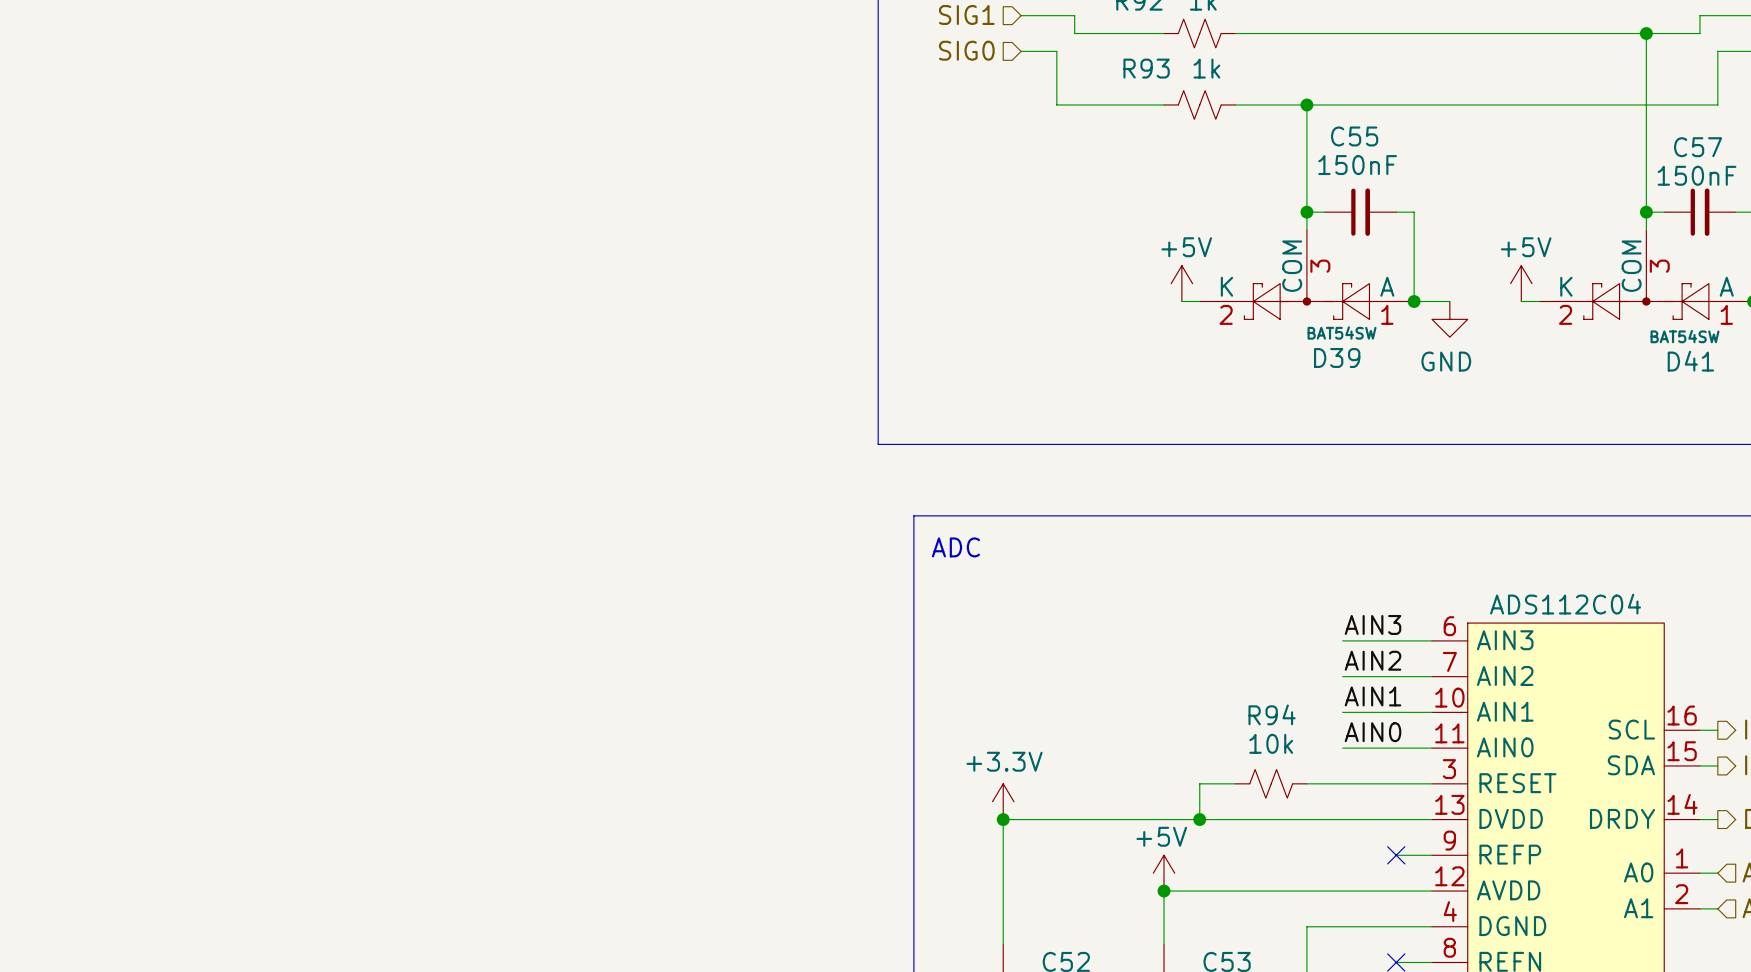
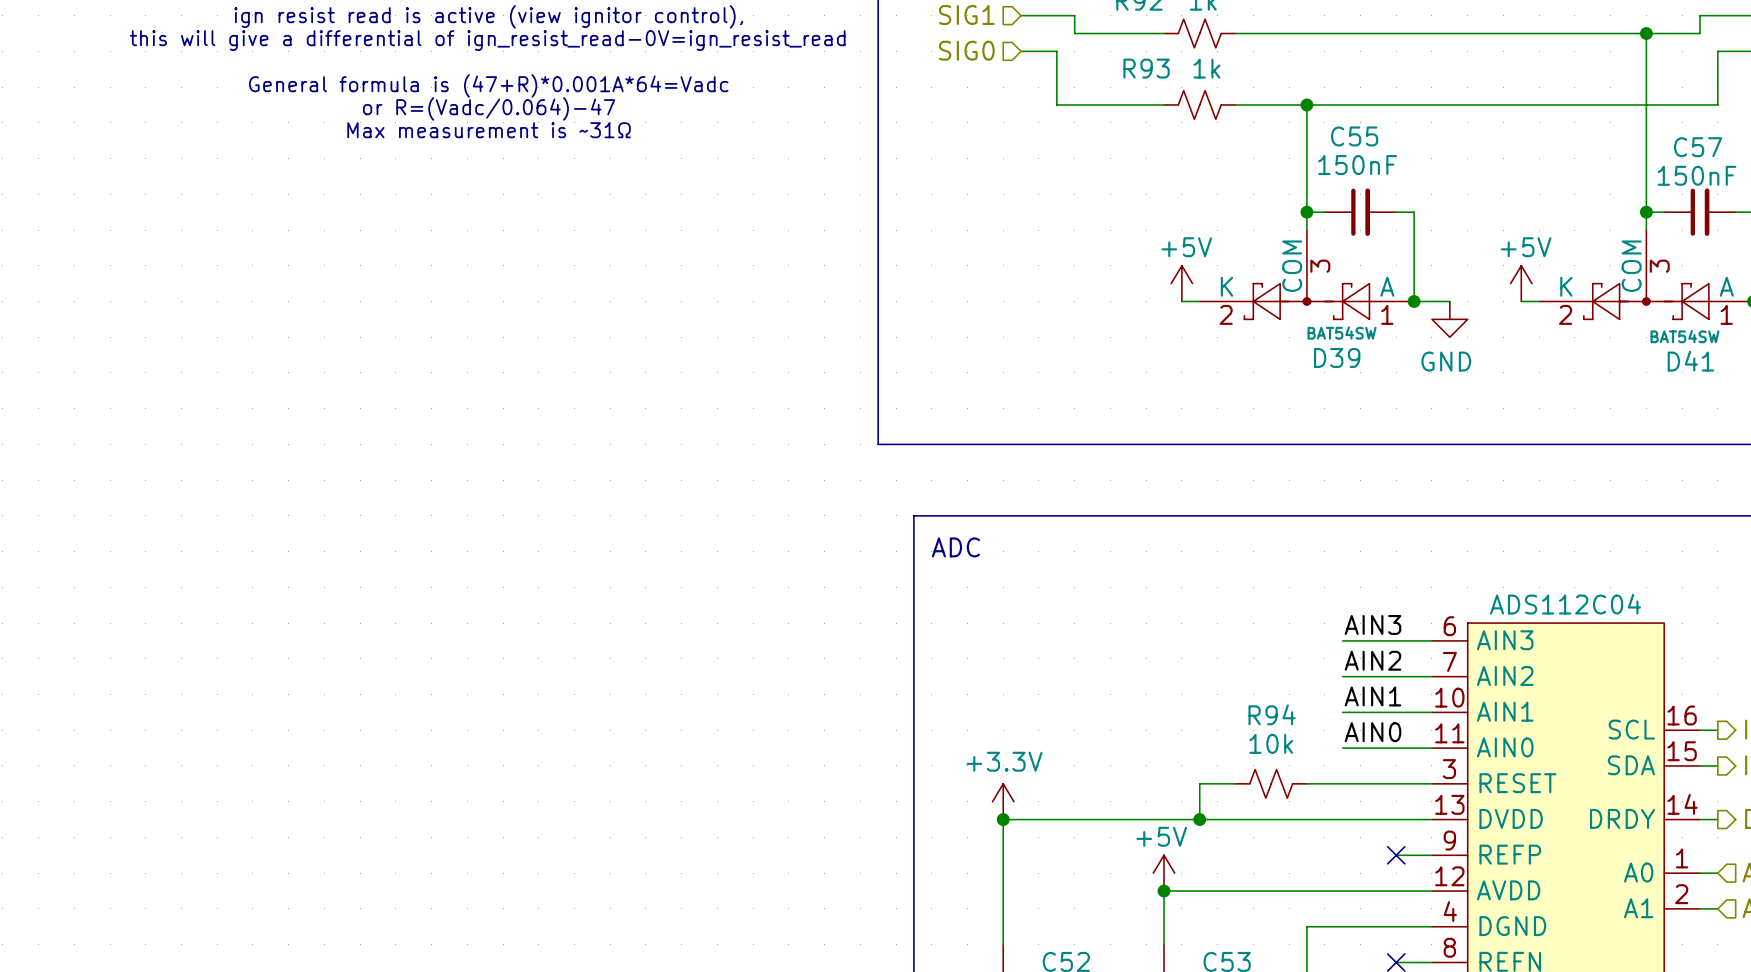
text: none -> ign resist read is active (view ignitor control), (488, 16)
text: none -> this will give a differential of ign_resist_read-0V=ign_resist_read (487, 40)
text: none -> General formula is (47+R)*0.001A*64=Vadc (488, 85)
text: none -> or R=(Vadc/0.064)-47 (489, 108)
text: none -> Max measurement is ~31Ω (489, 130)

